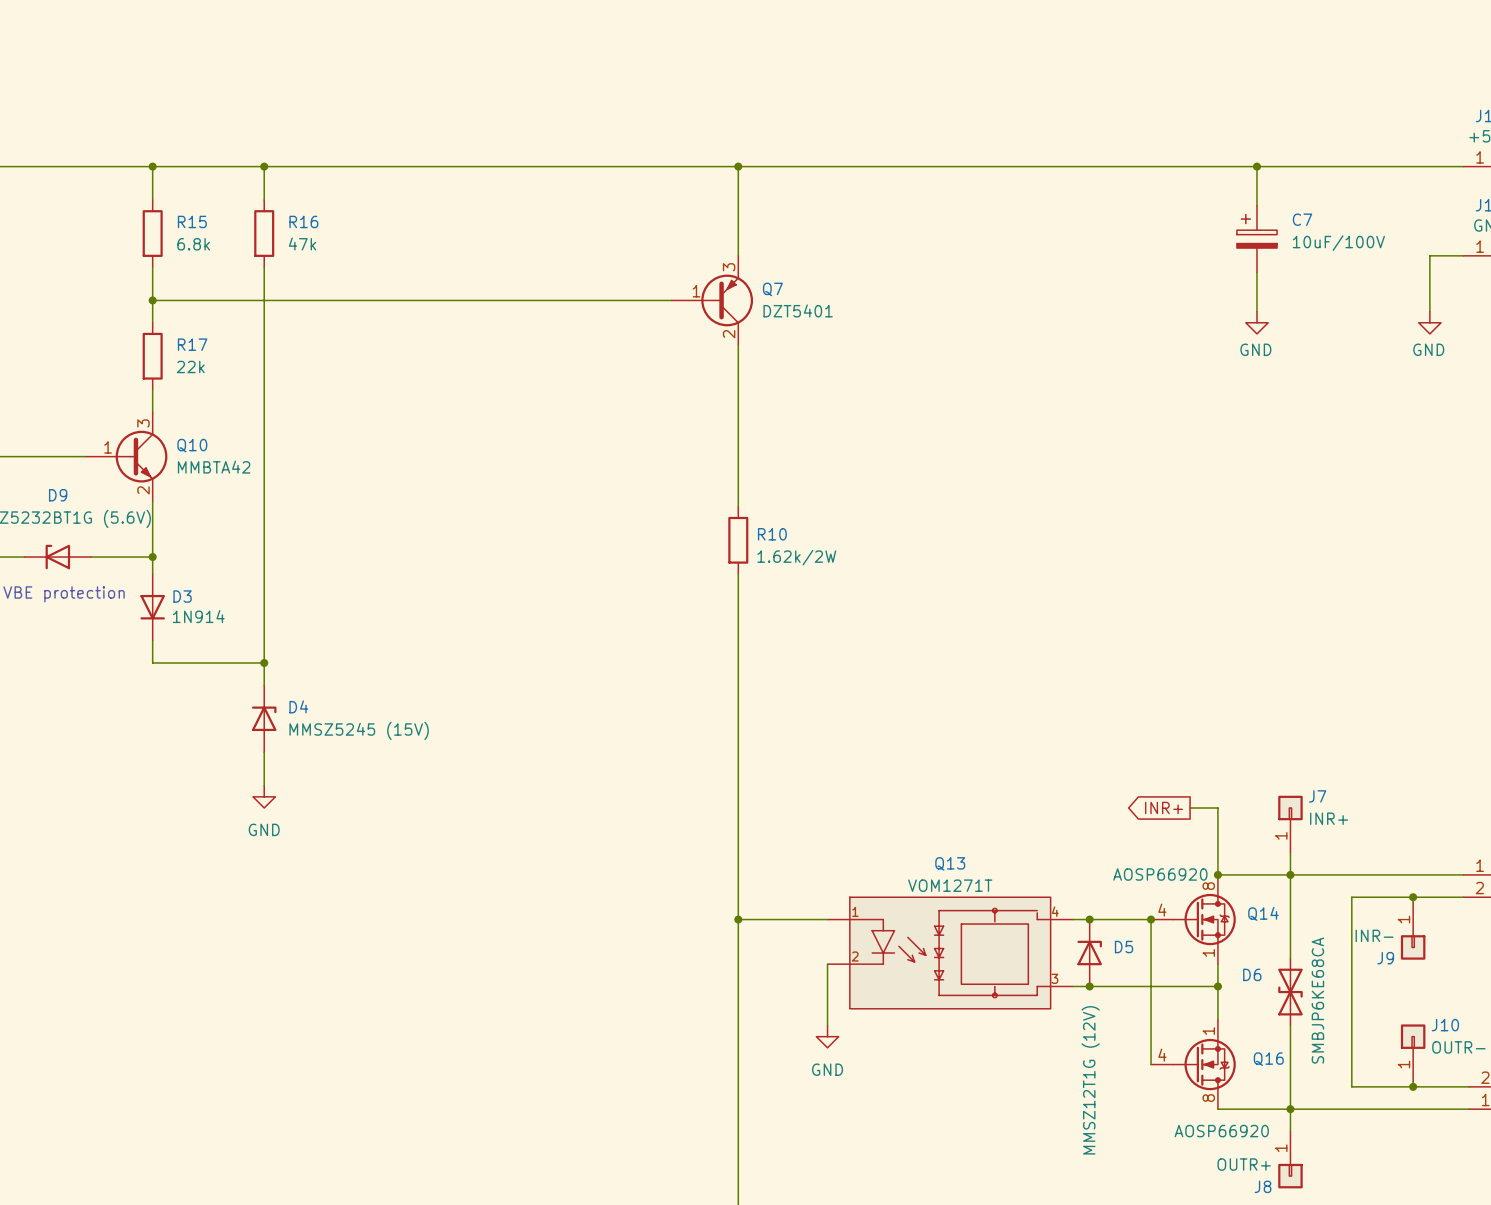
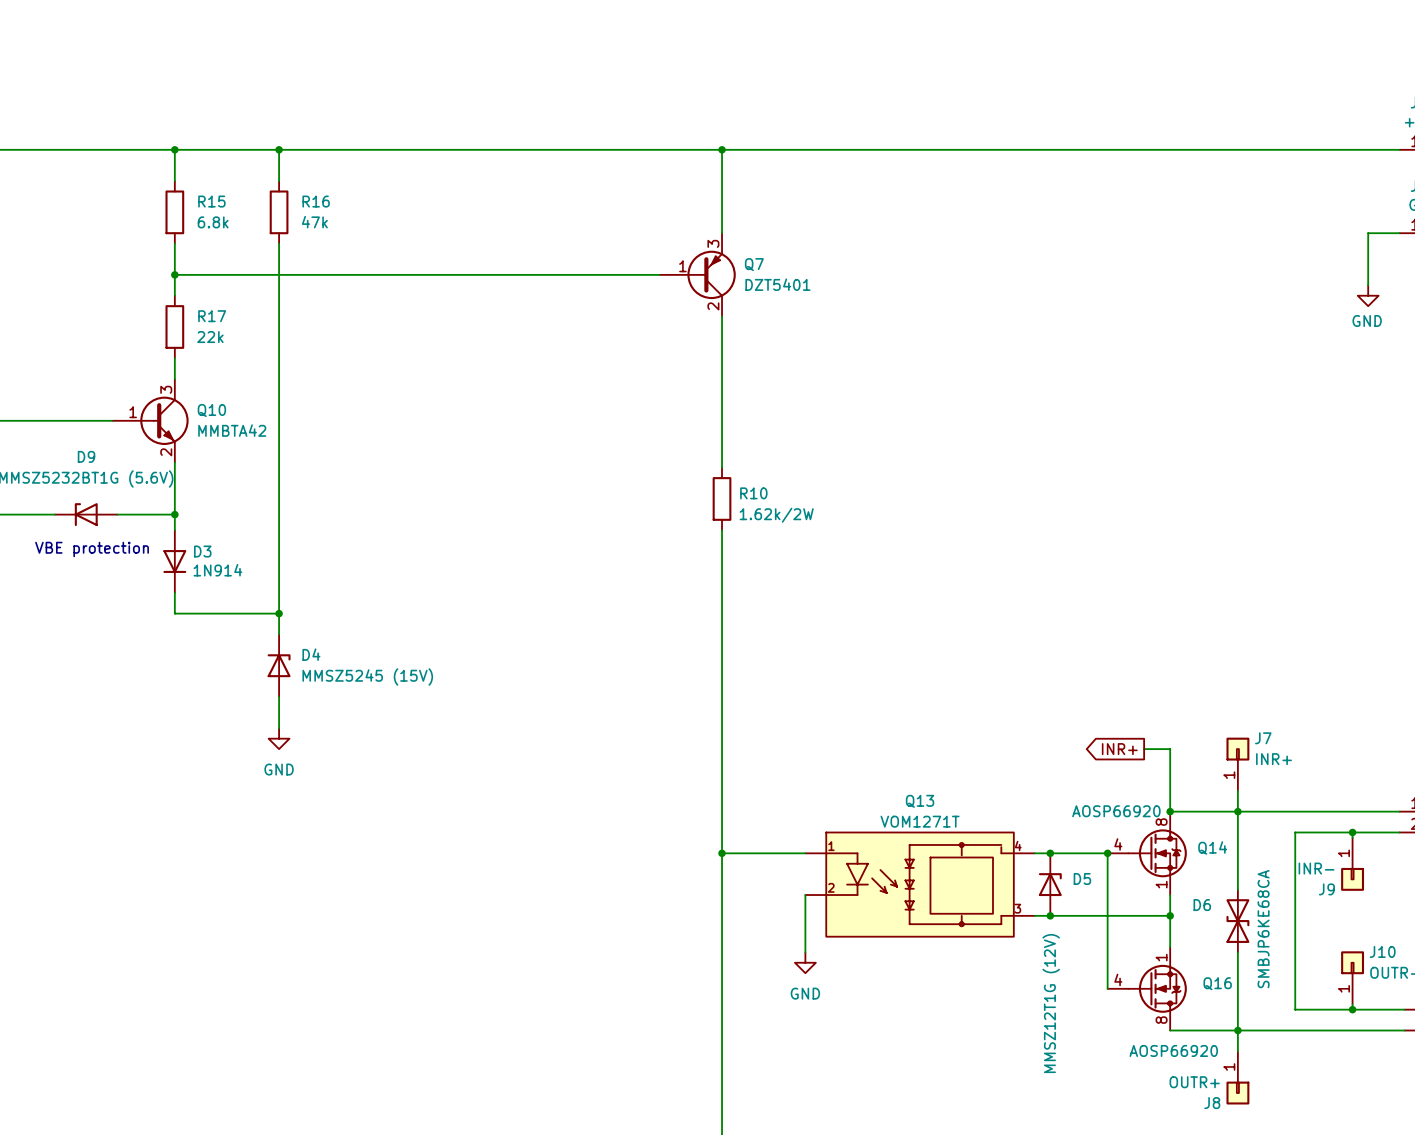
wire: (1256, 166) (1256, 205) -> none
junction: (1256, 166) -> none
C7: 10uF/100V (1256, 239) -> none
wire: (1256, 272) (1256, 311) -> none
power symbol: GND (1256, 322) -> none

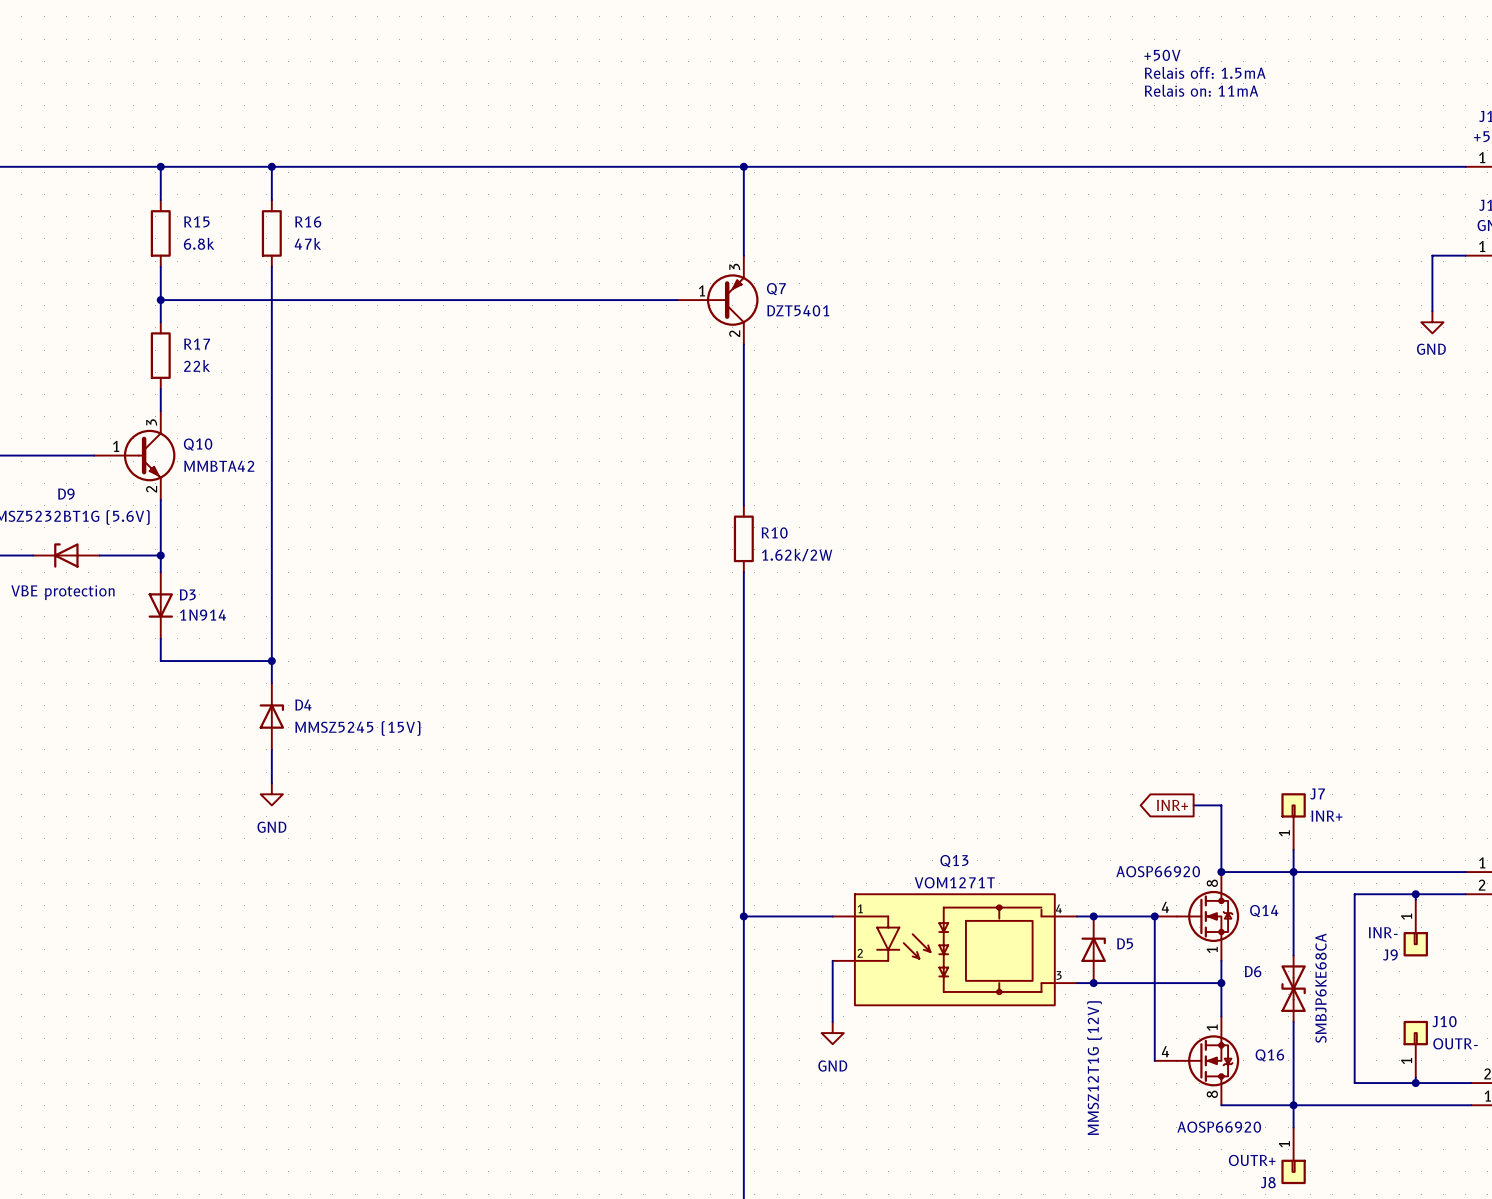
text: none -> +50V (1162, 55)
text: none -> Relais off: 1.5mA (1205, 72)
text: none -> Relais on: 11mA (1201, 90)

